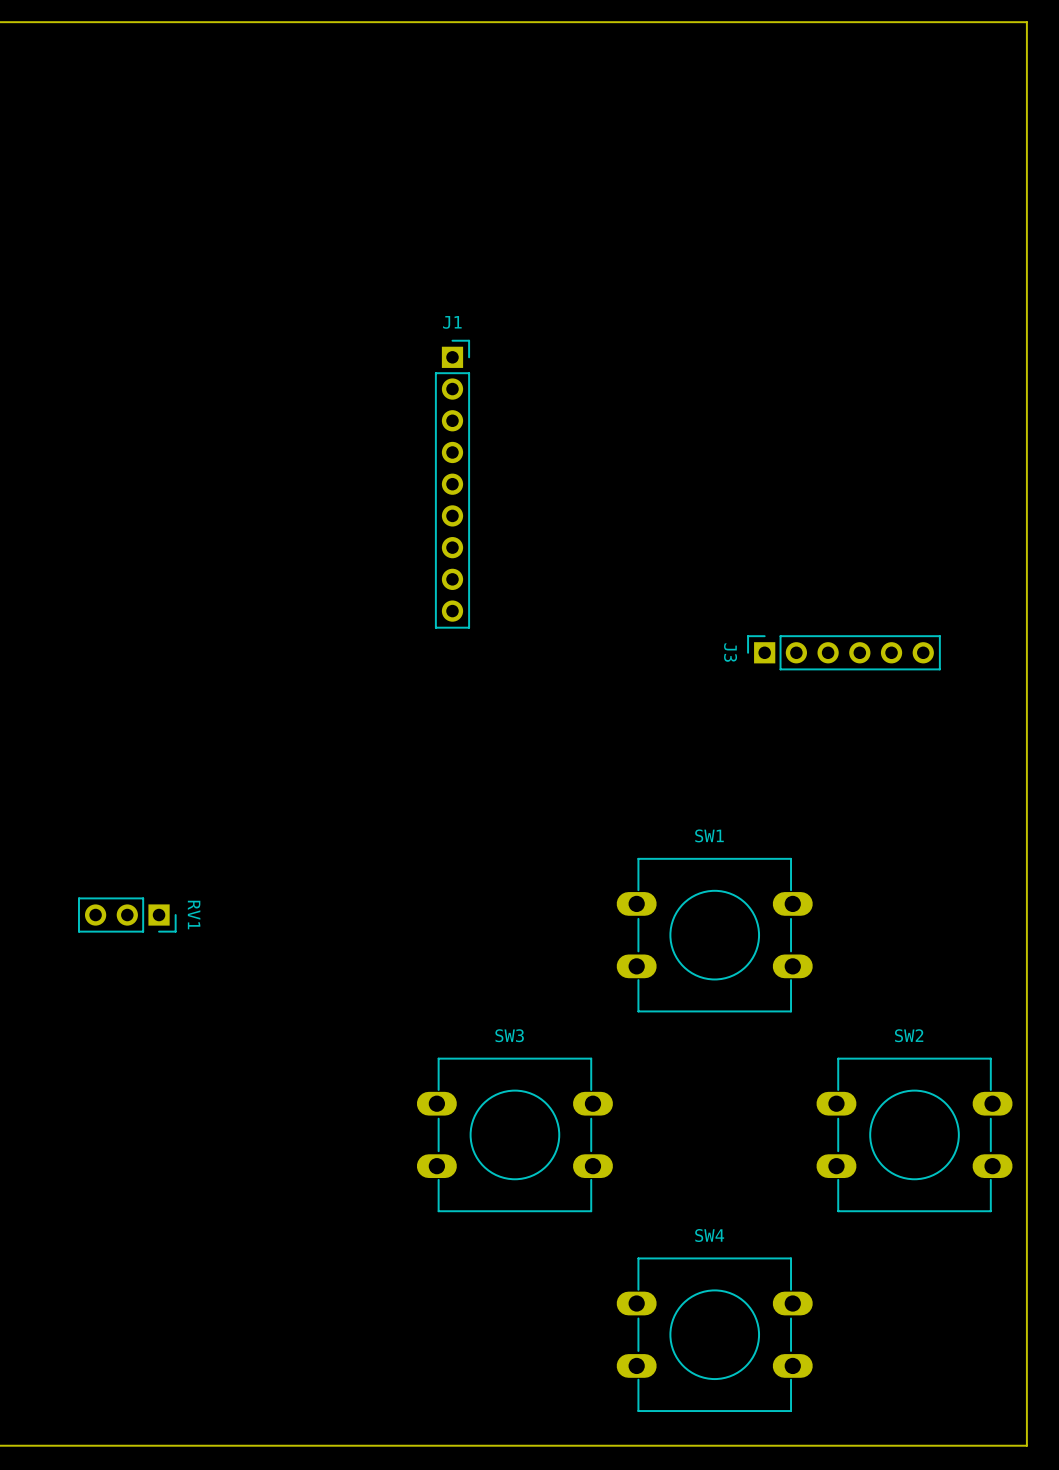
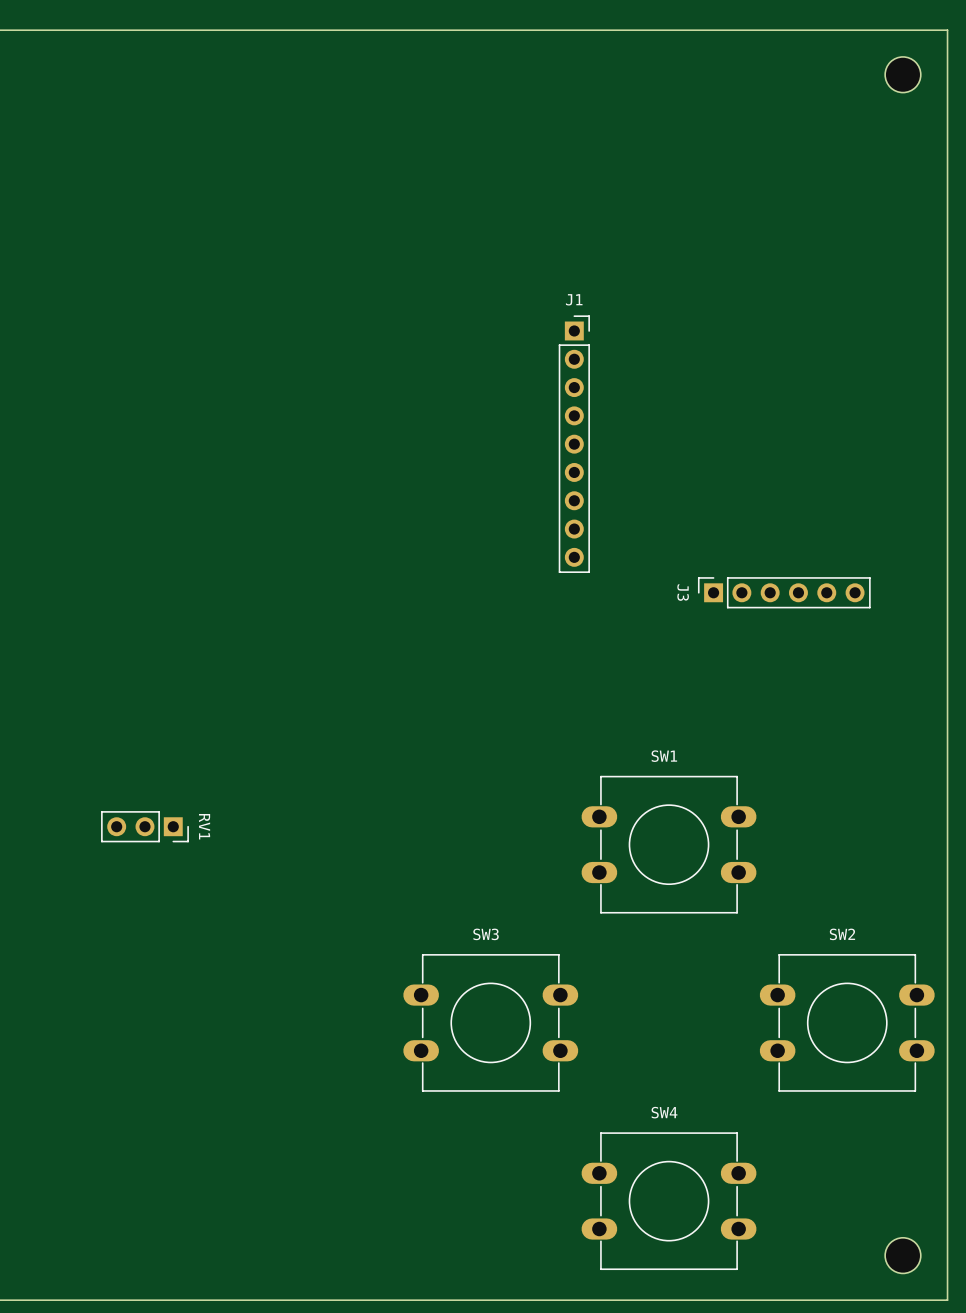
part: none -> (902, 74)
J1 position: (452, 484) -> (574, 444)
part: none -> (902, 1255)

